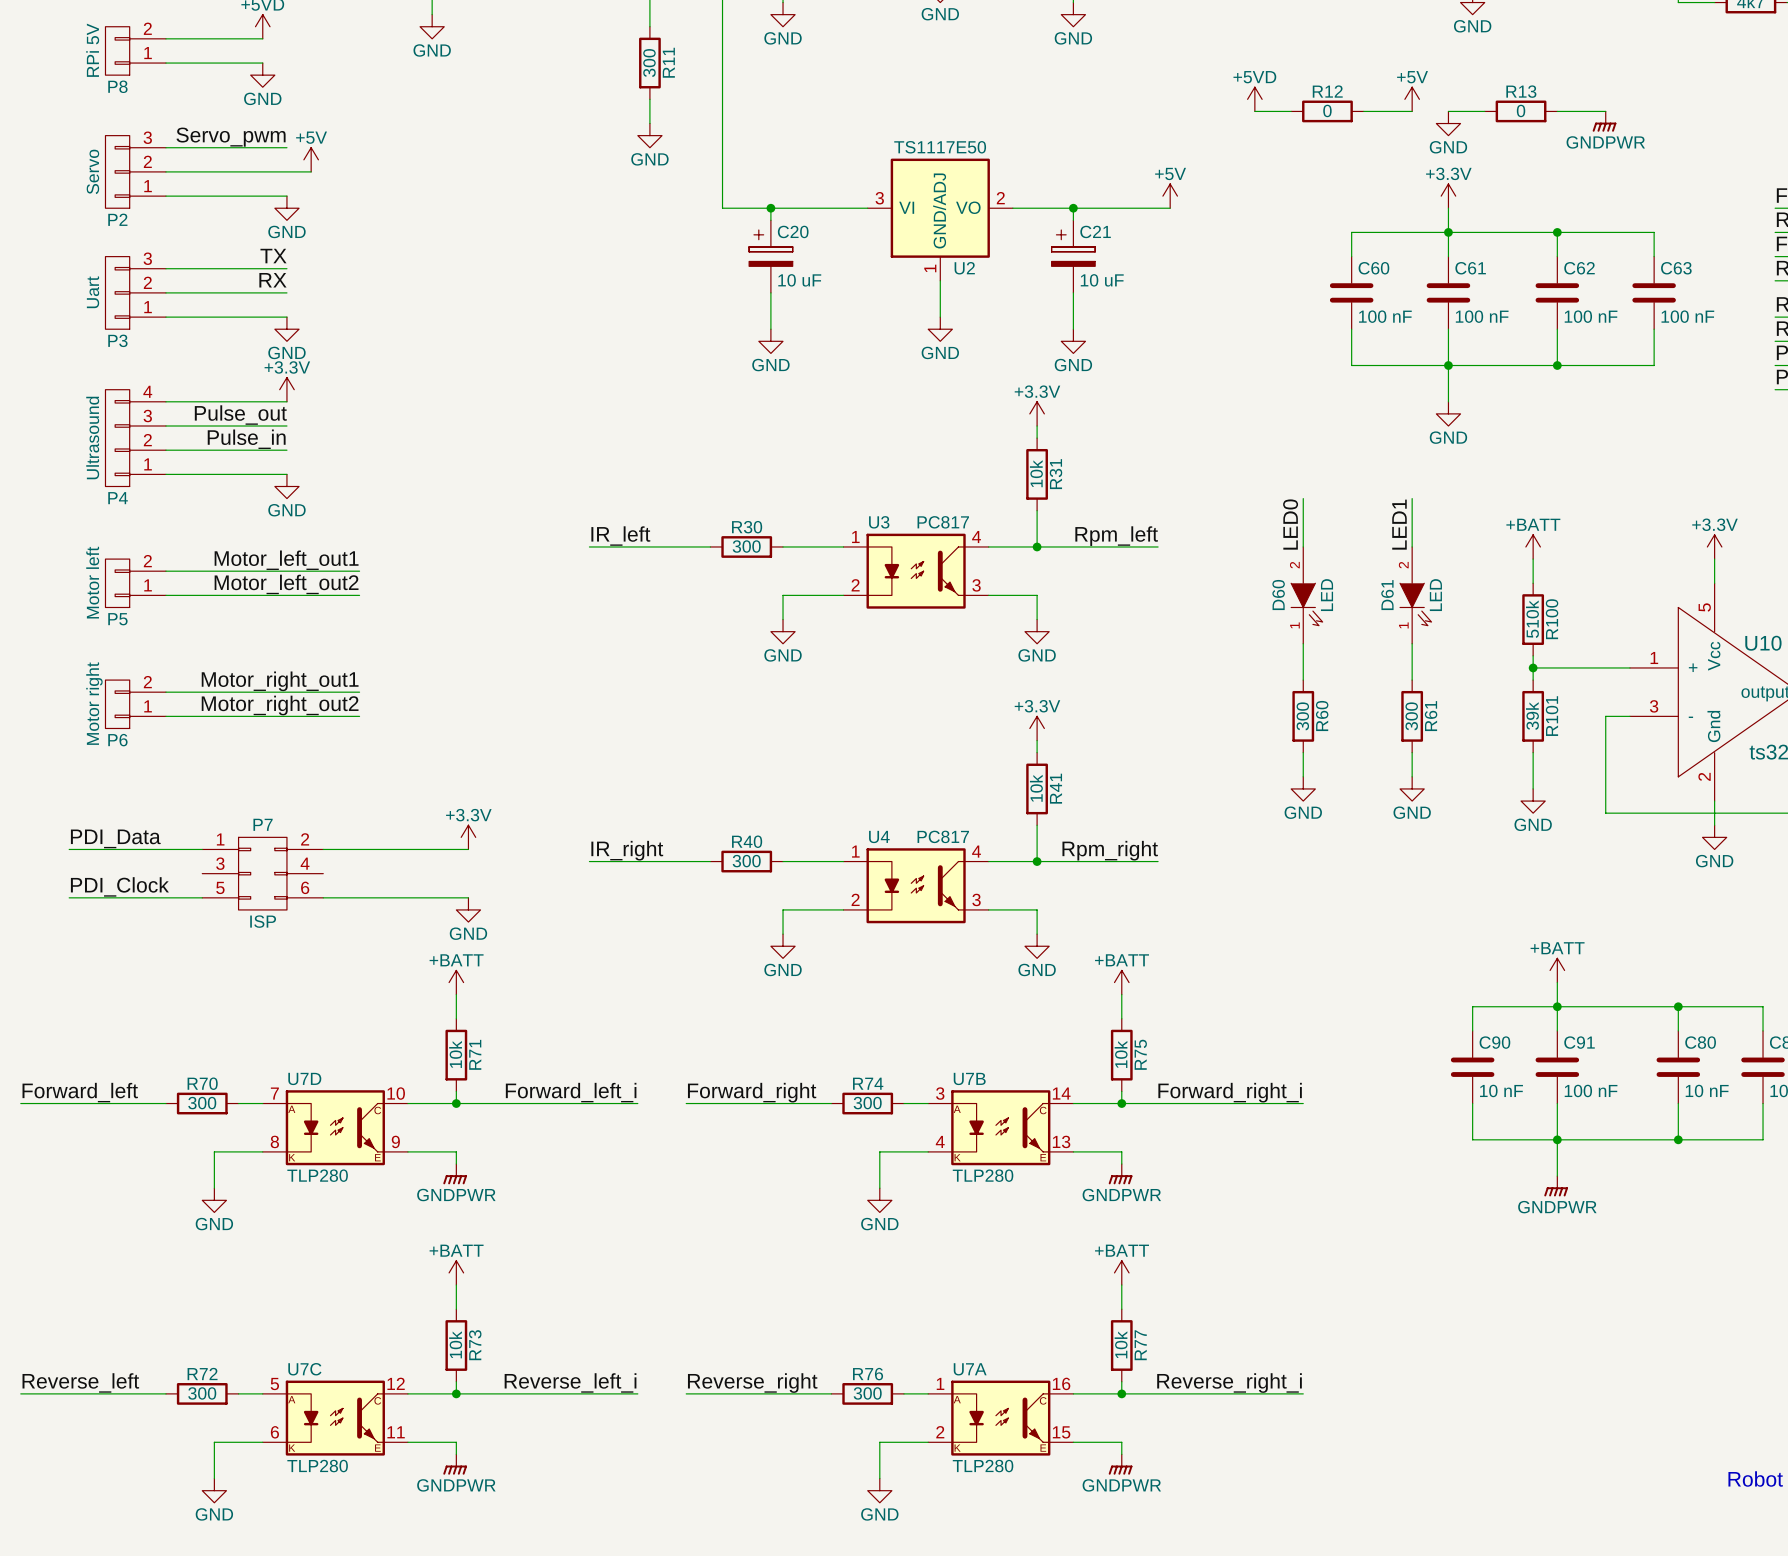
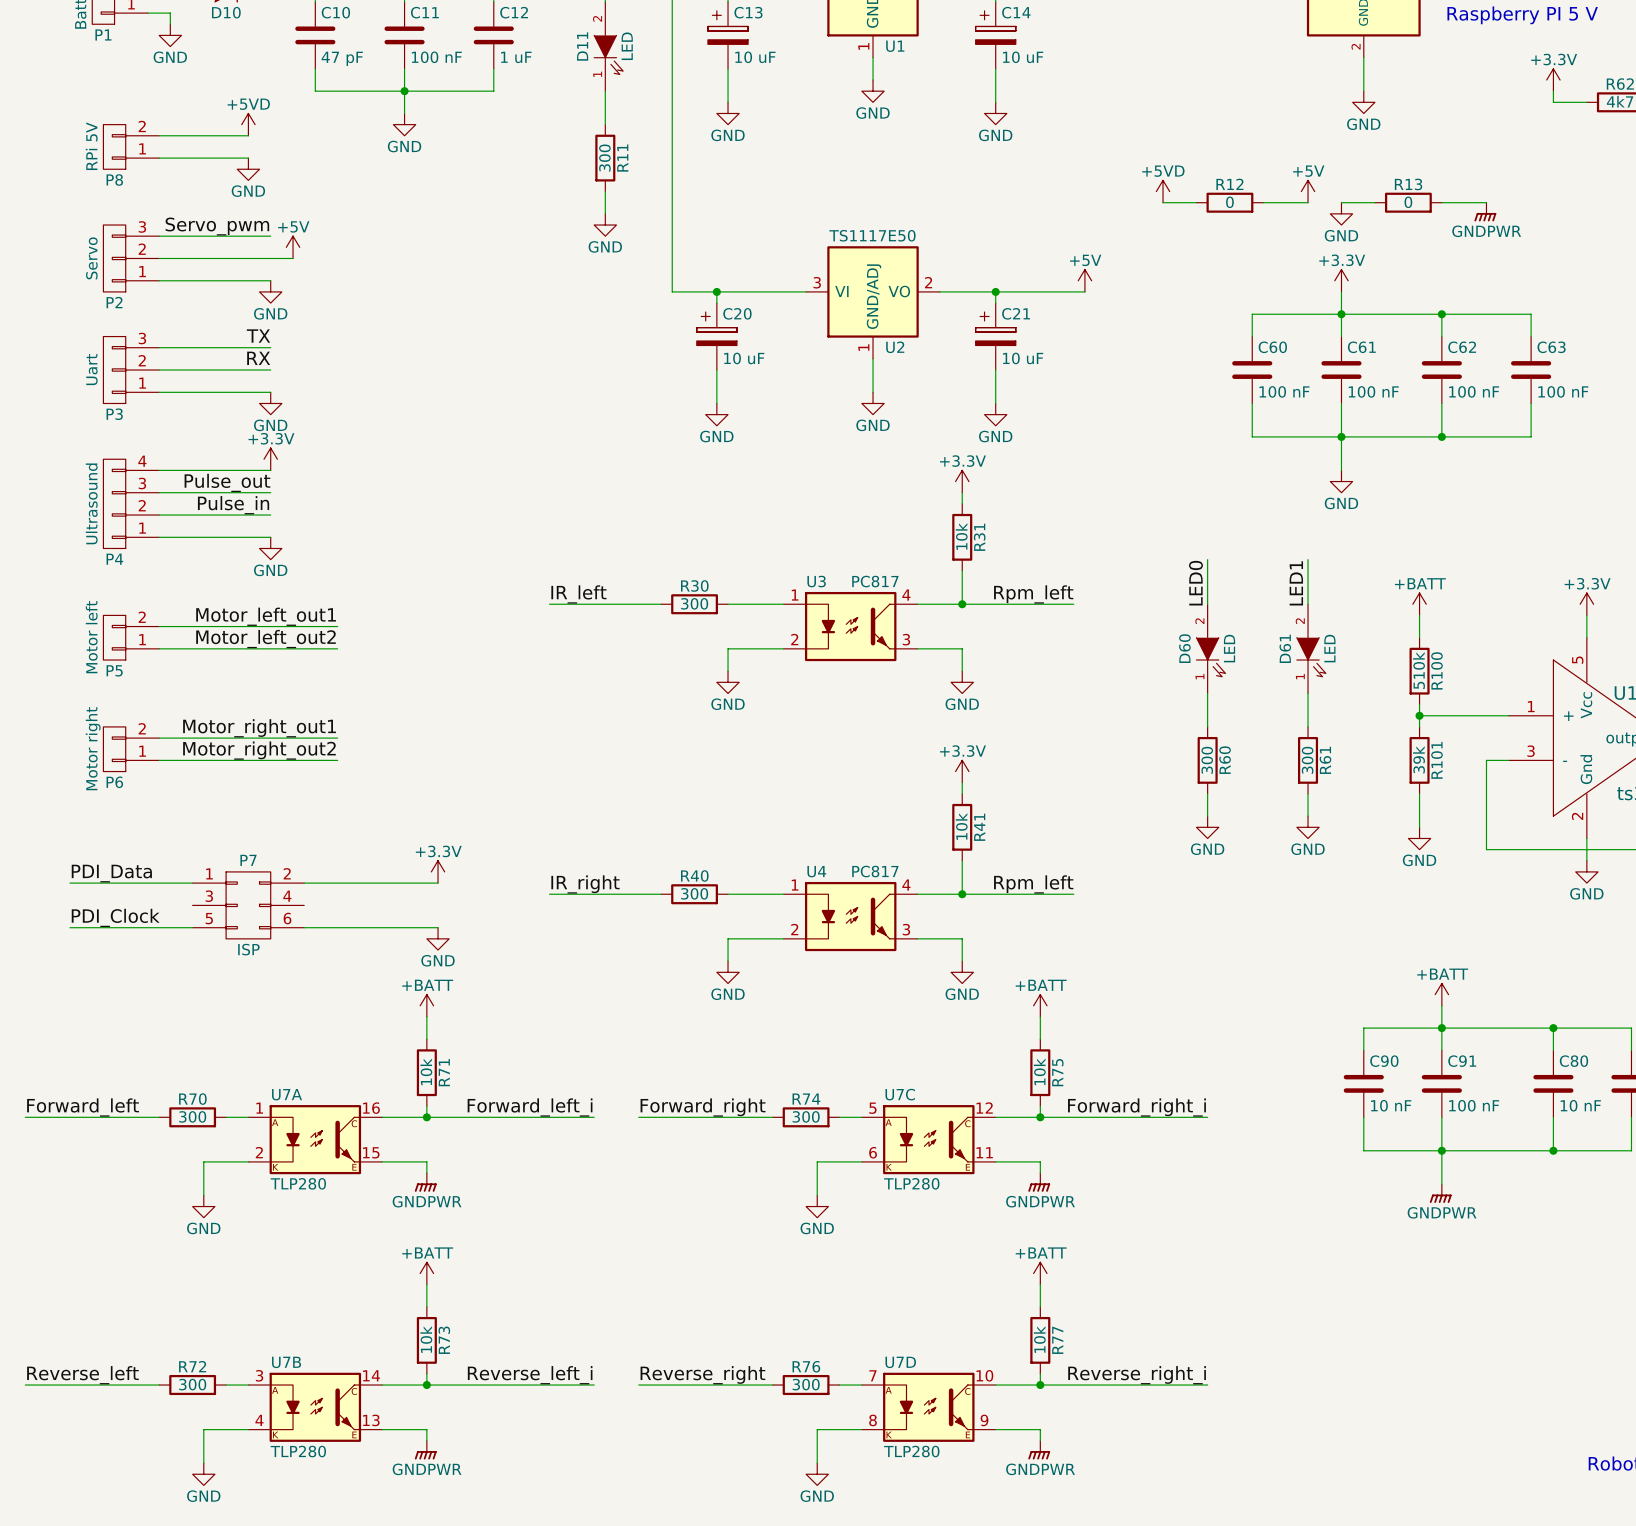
label: Rpm_right (1110, 850) -> Rpm_left (1033, 884)
U7D position: (335, 1127) -> (928, 1407)
U7B position: (1000, 1127) -> (315, 1407)
U7C position: (335, 1418) -> (928, 1139)
U7A position: (1000, 1418) -> (315, 1139)

